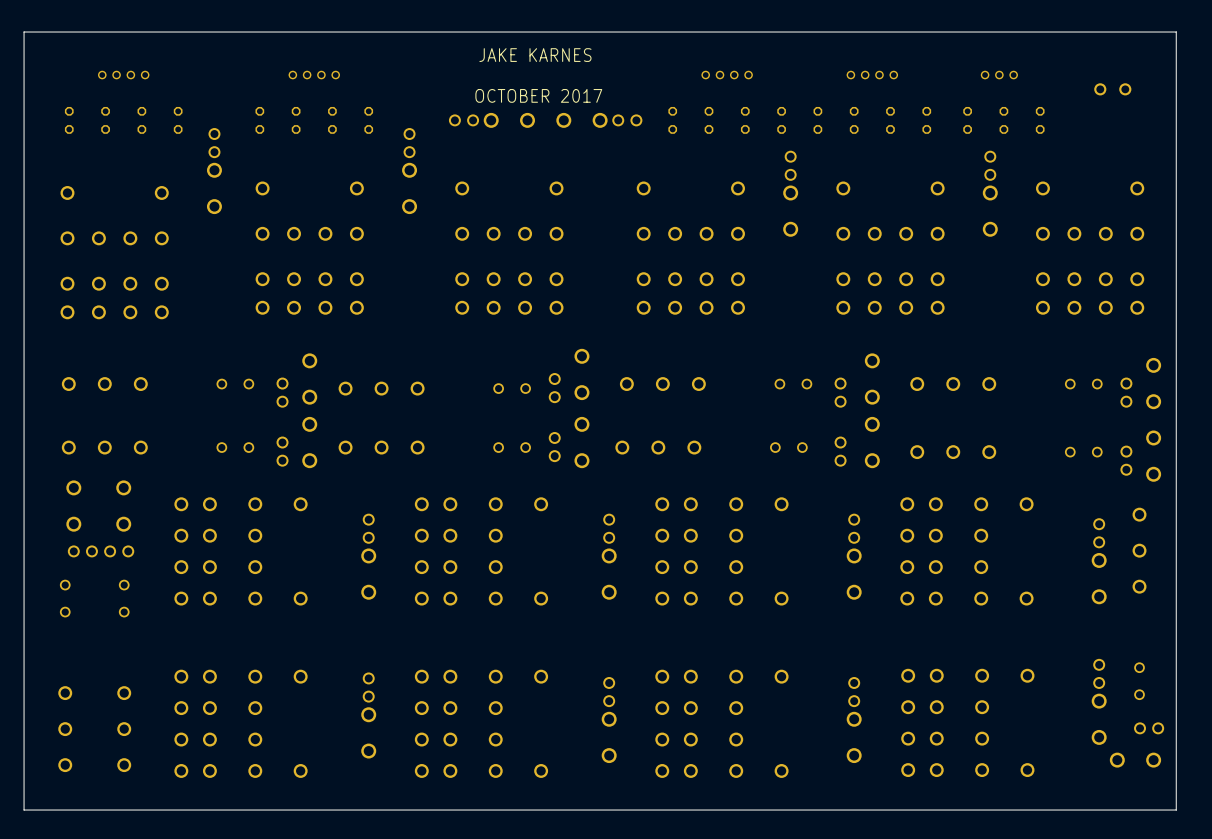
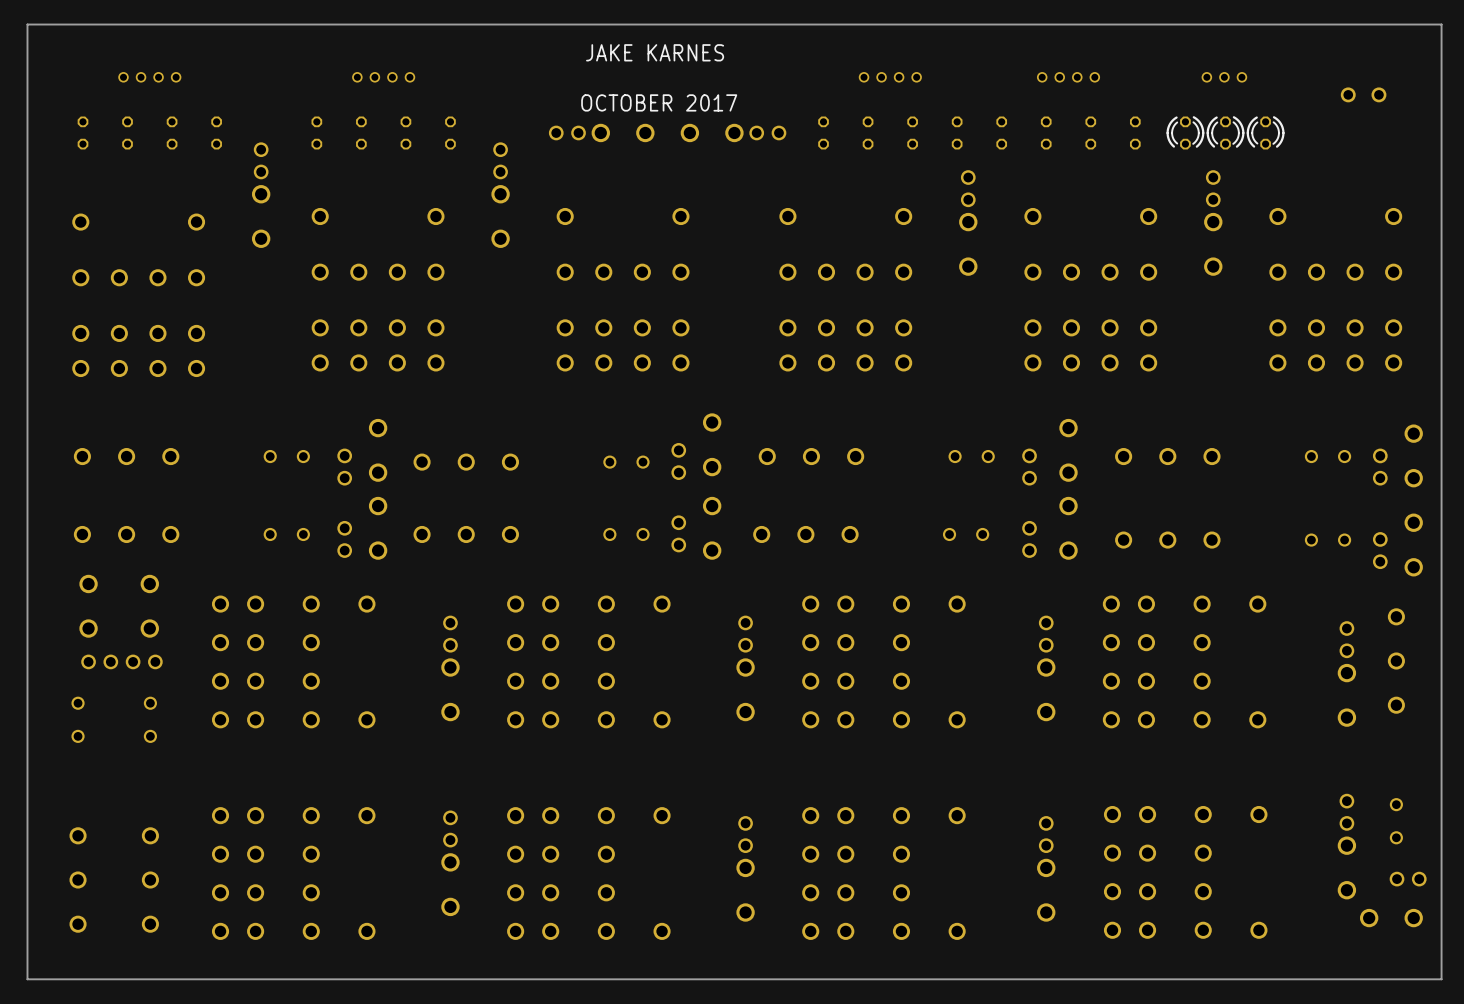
part side: top (967, 120) -> bottom (1185, 132)
part side: top (1003, 120) -> bottom (1225, 132)
part side: top (1040, 120) -> bottom (1265, 132)

